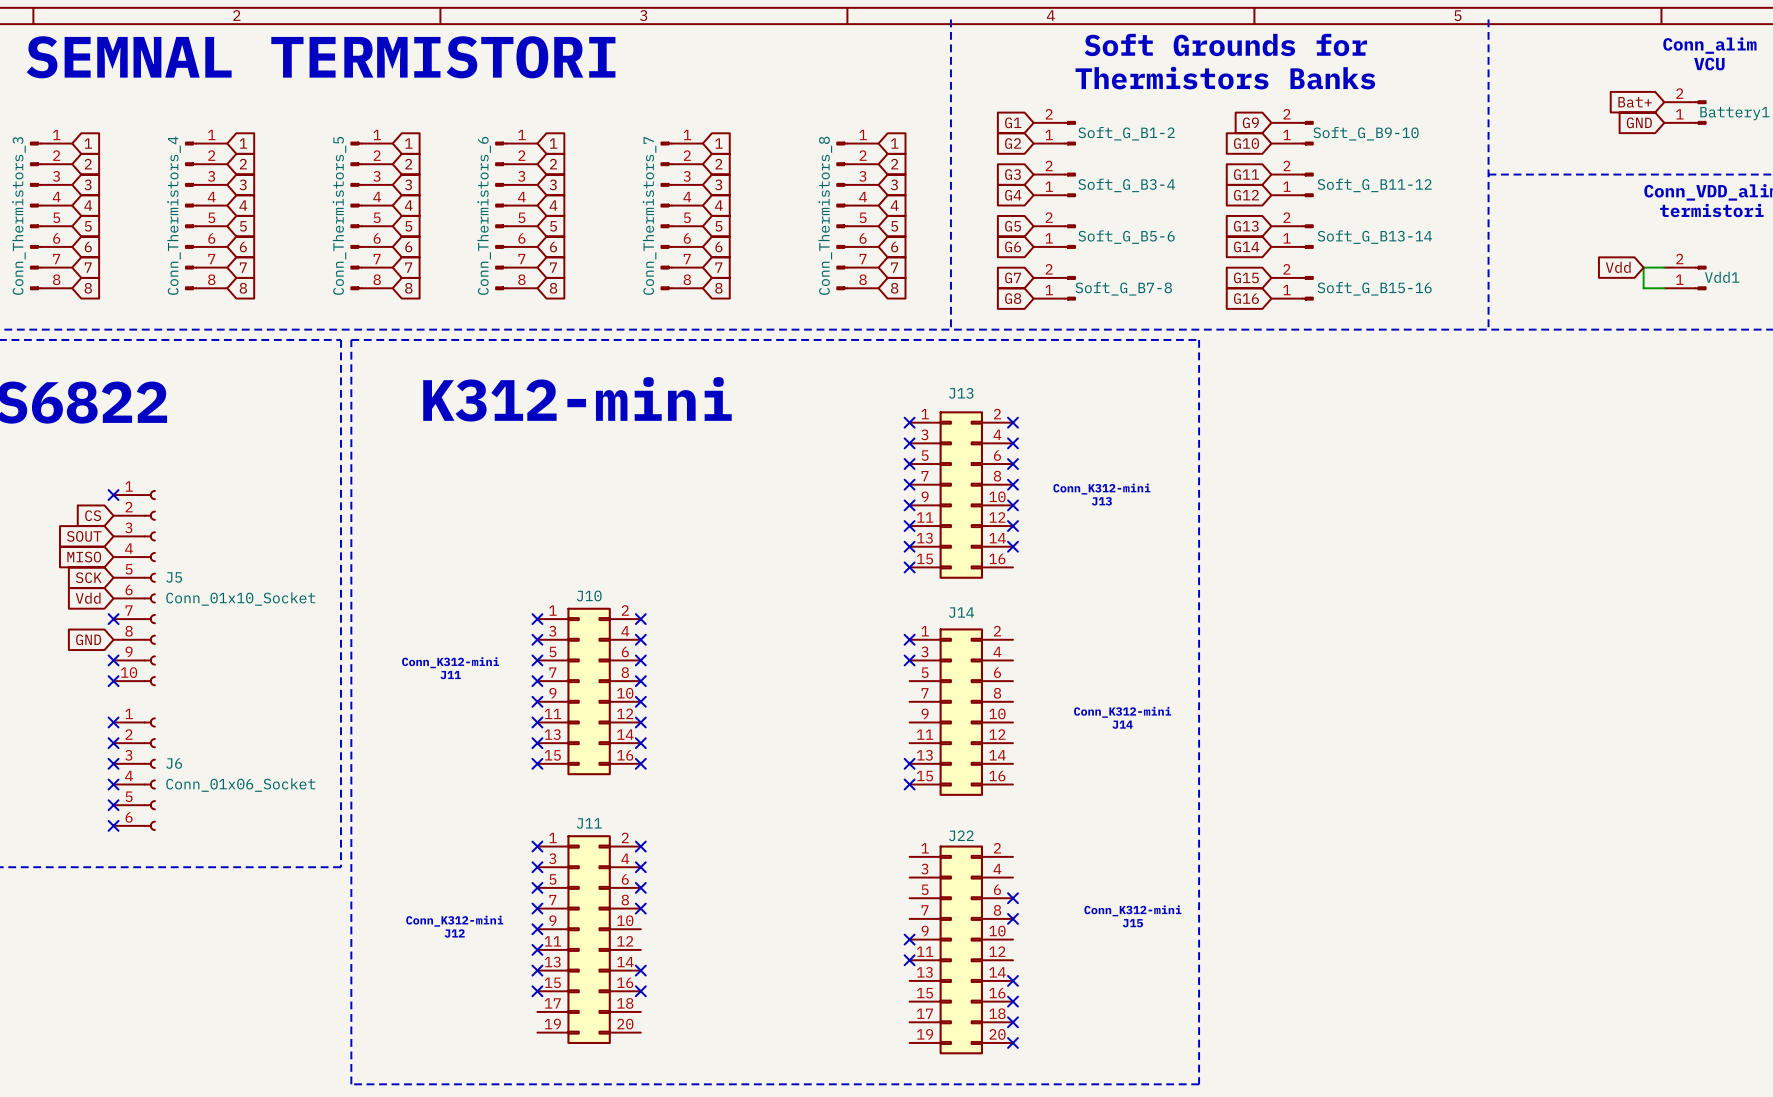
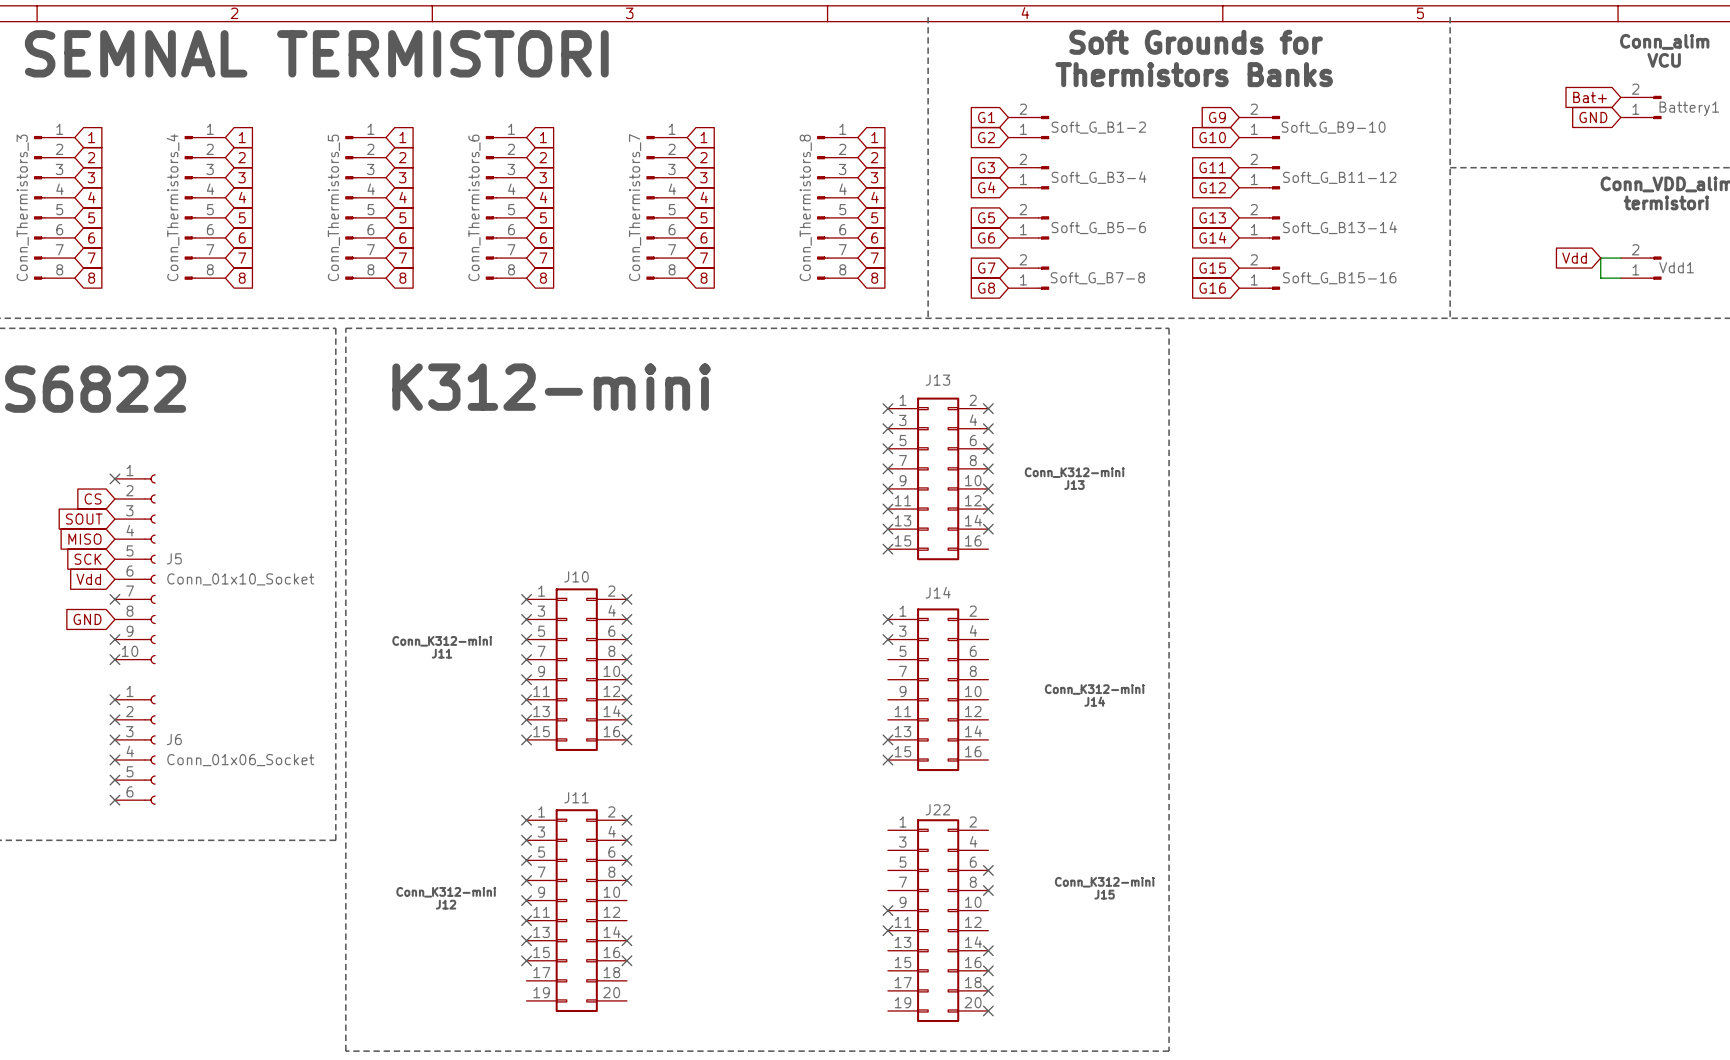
text position: K312-mini (577, 399) -> K312-mini (551, 387)

